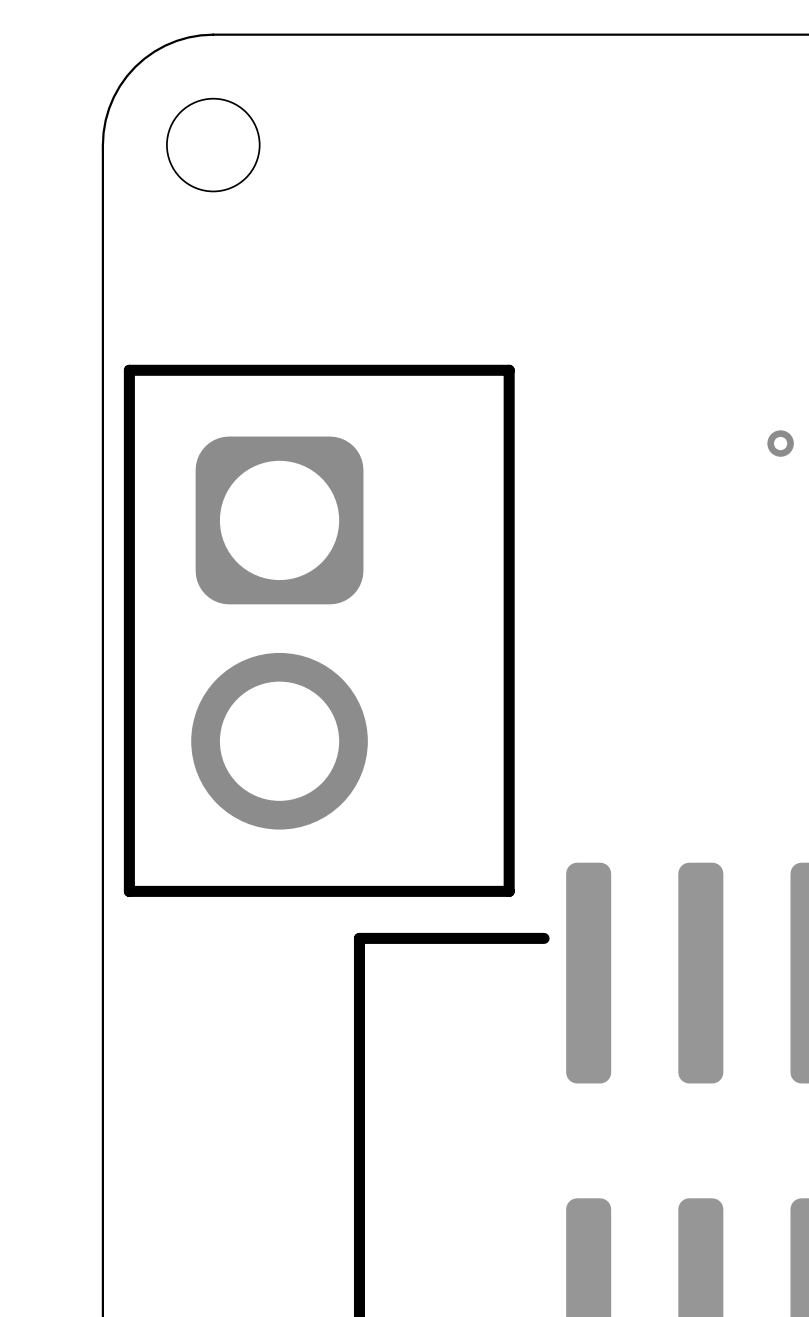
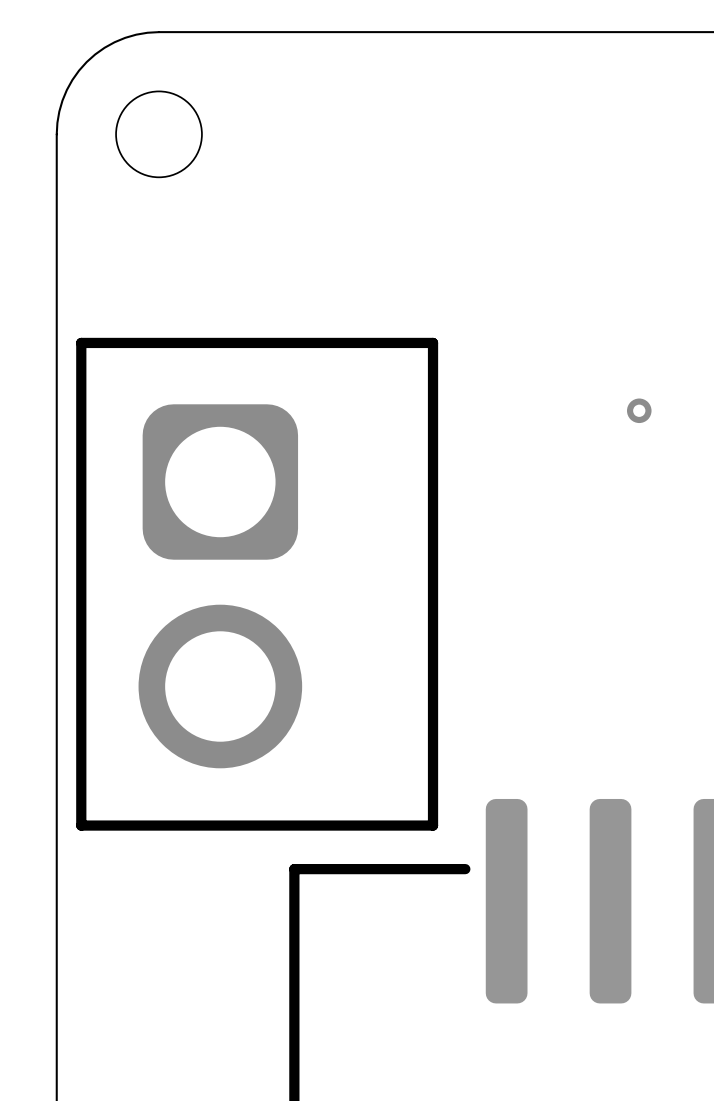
via: none -> (639, 410)
via: (780, 443) -> none

